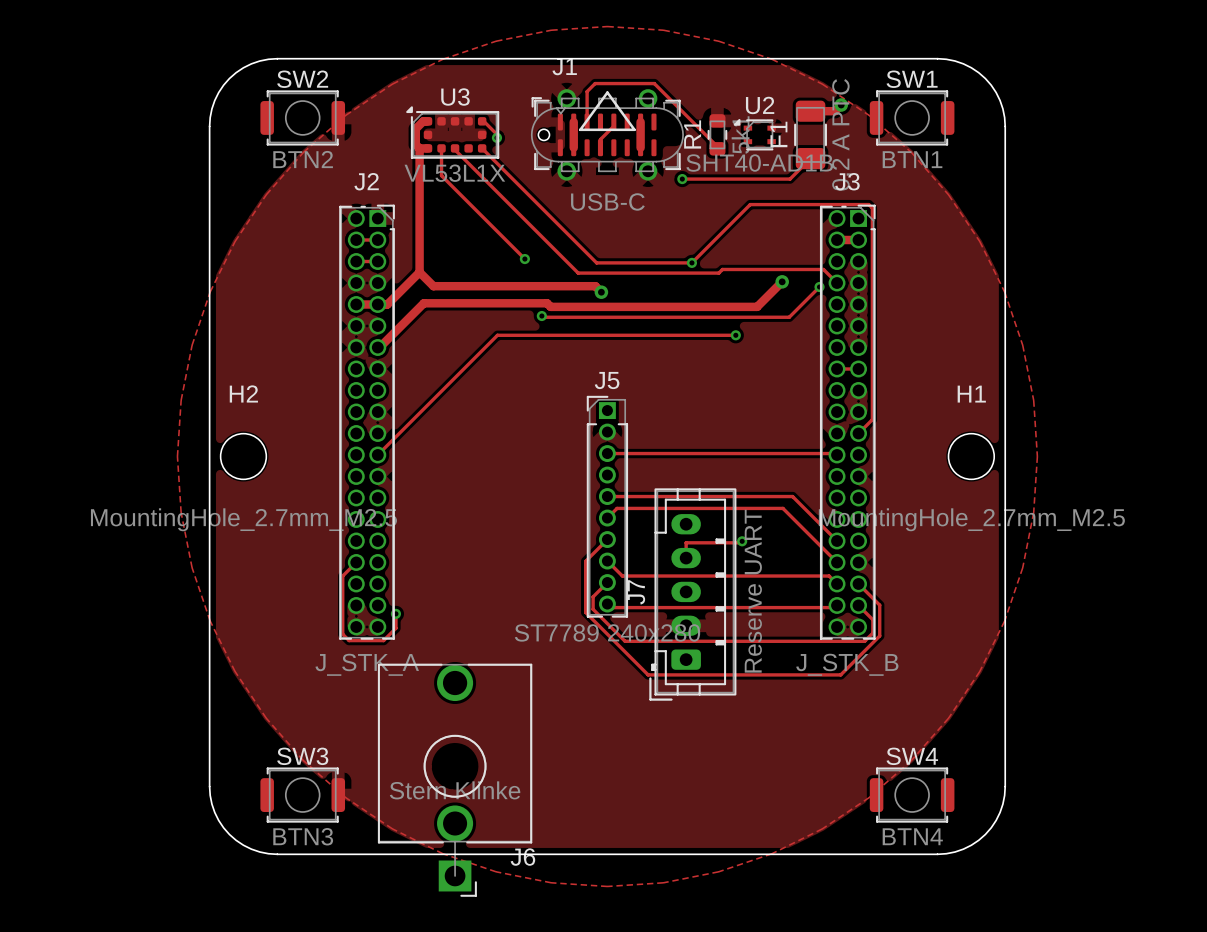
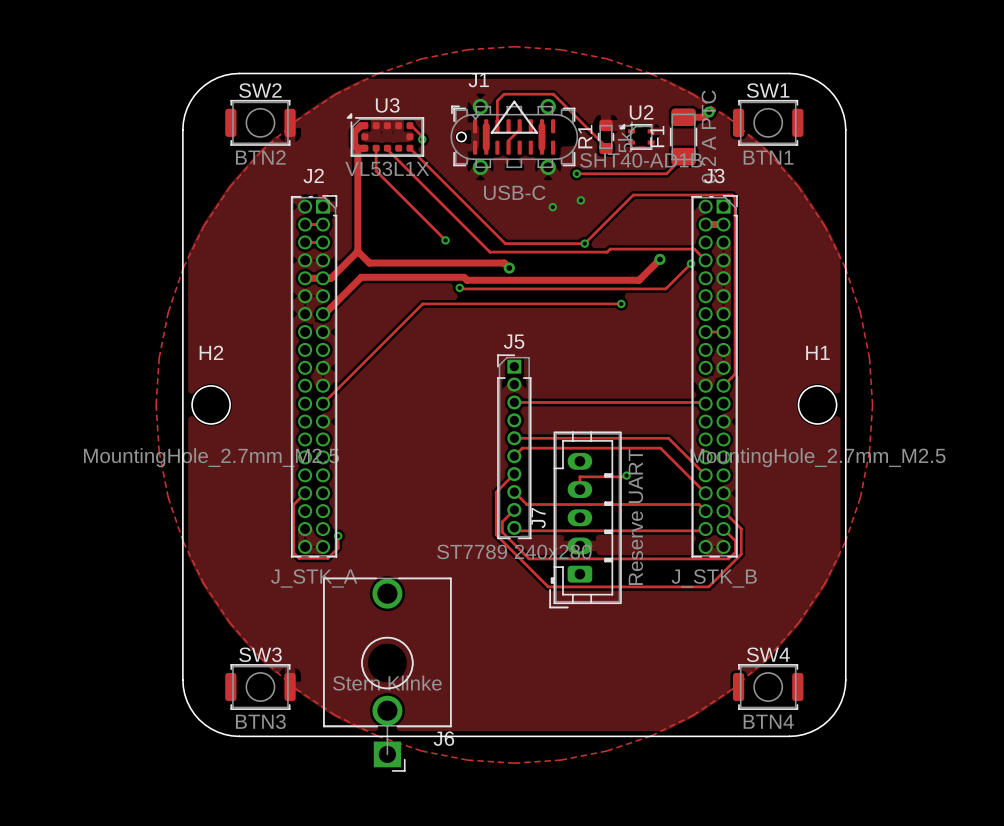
via: none -> (580, 200)
via: none -> (552, 207)

